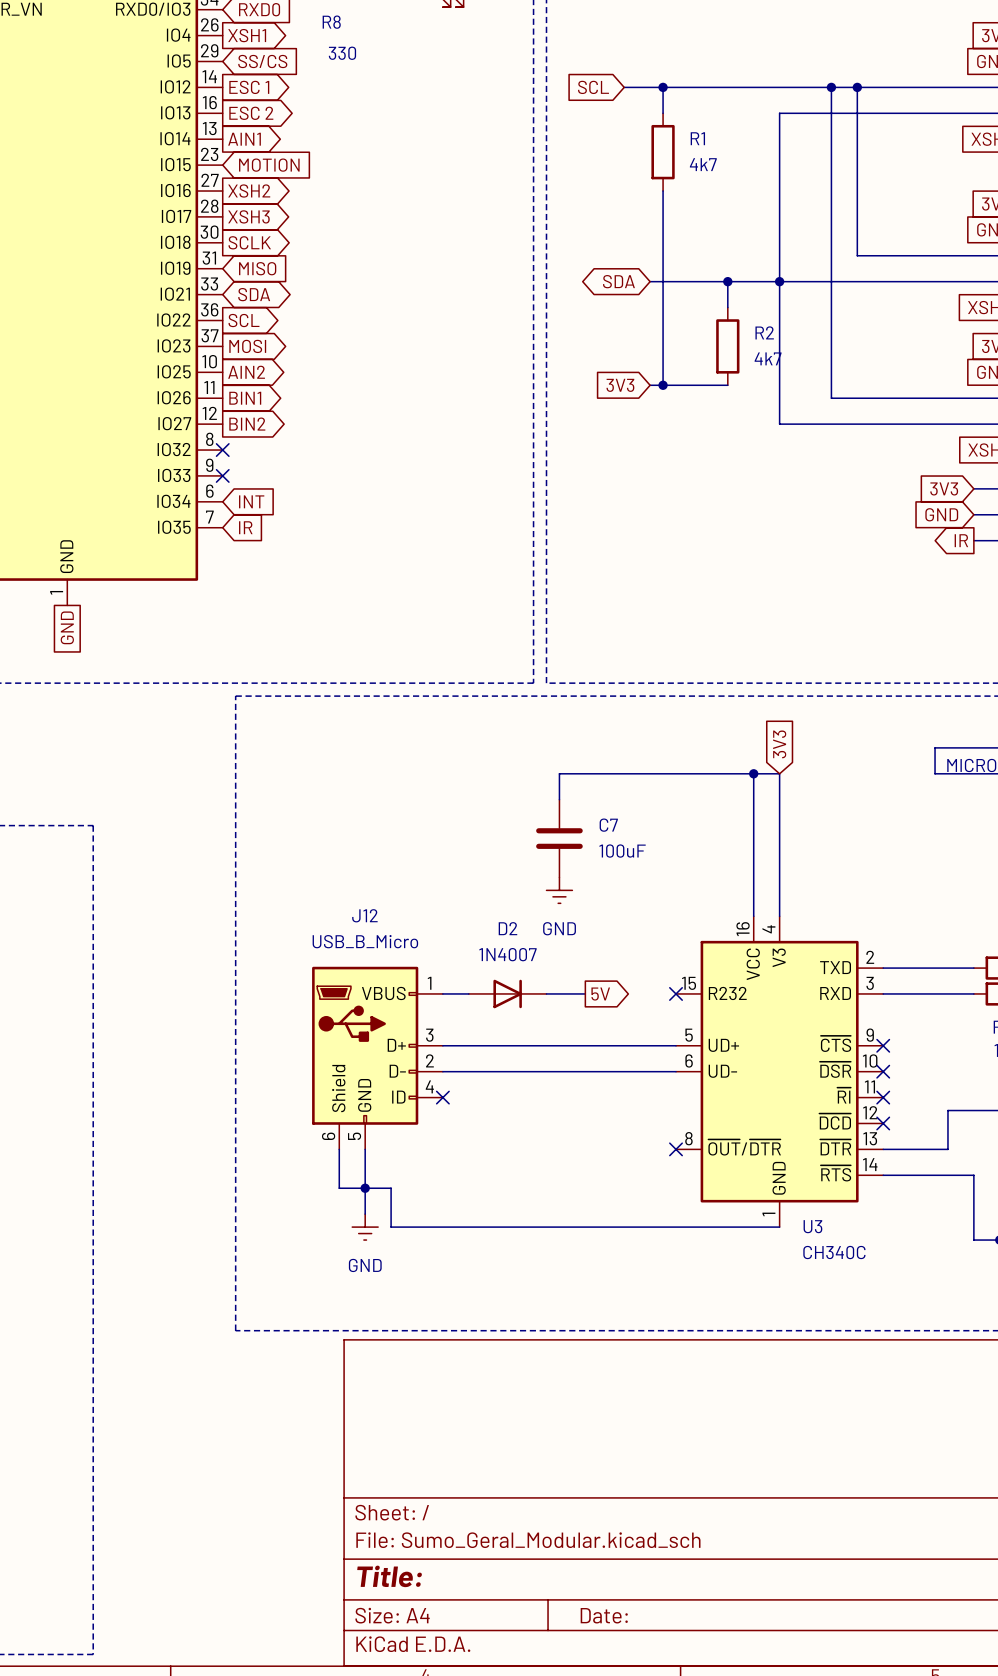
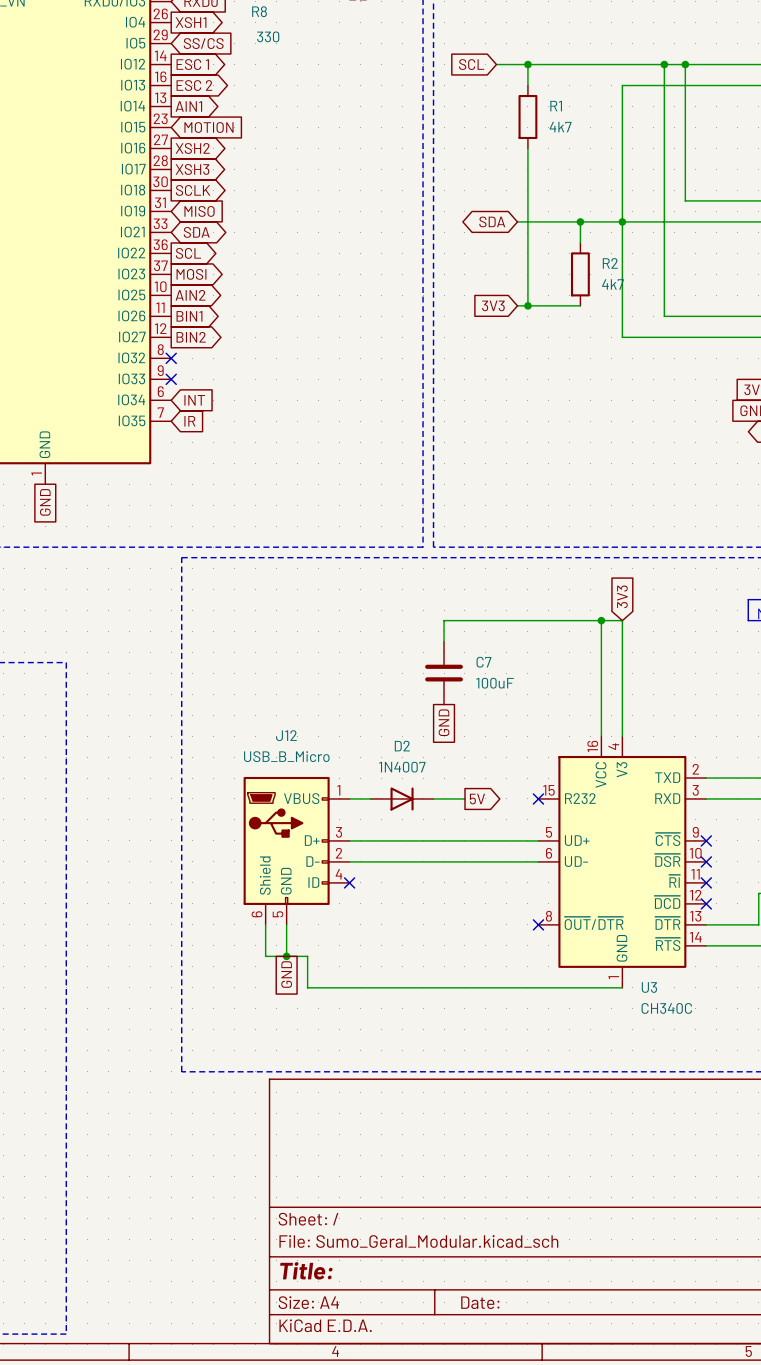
power symbol: GND (559, 890) -> none
global label: none -> GND (444, 722)
wire: (365, 1188) (365, 1214) -> none
global label: none -> GND (286, 974)
power symbol: GND (365, 1227) -> none

